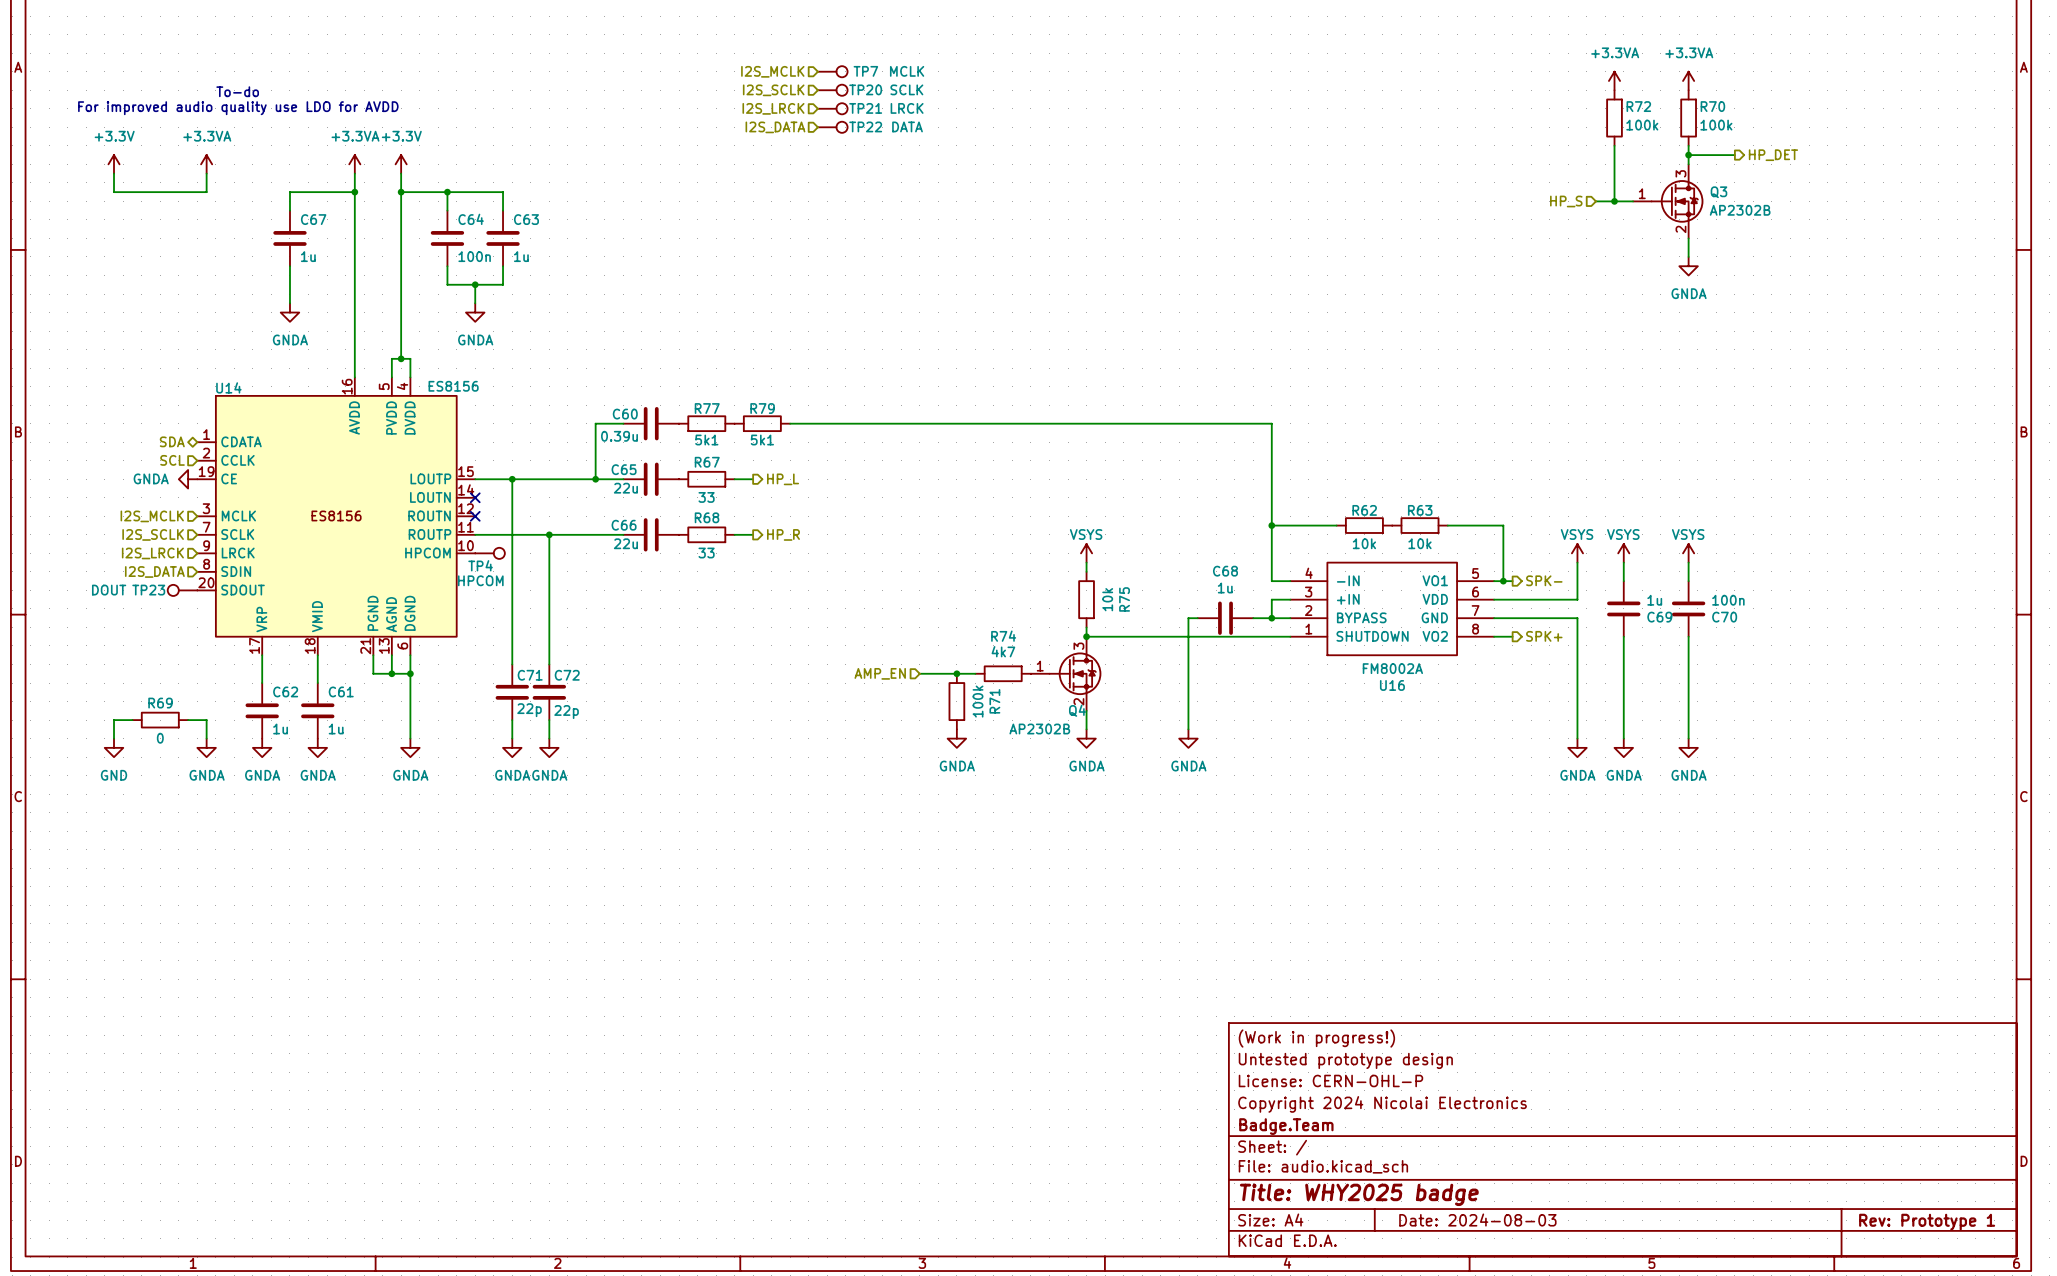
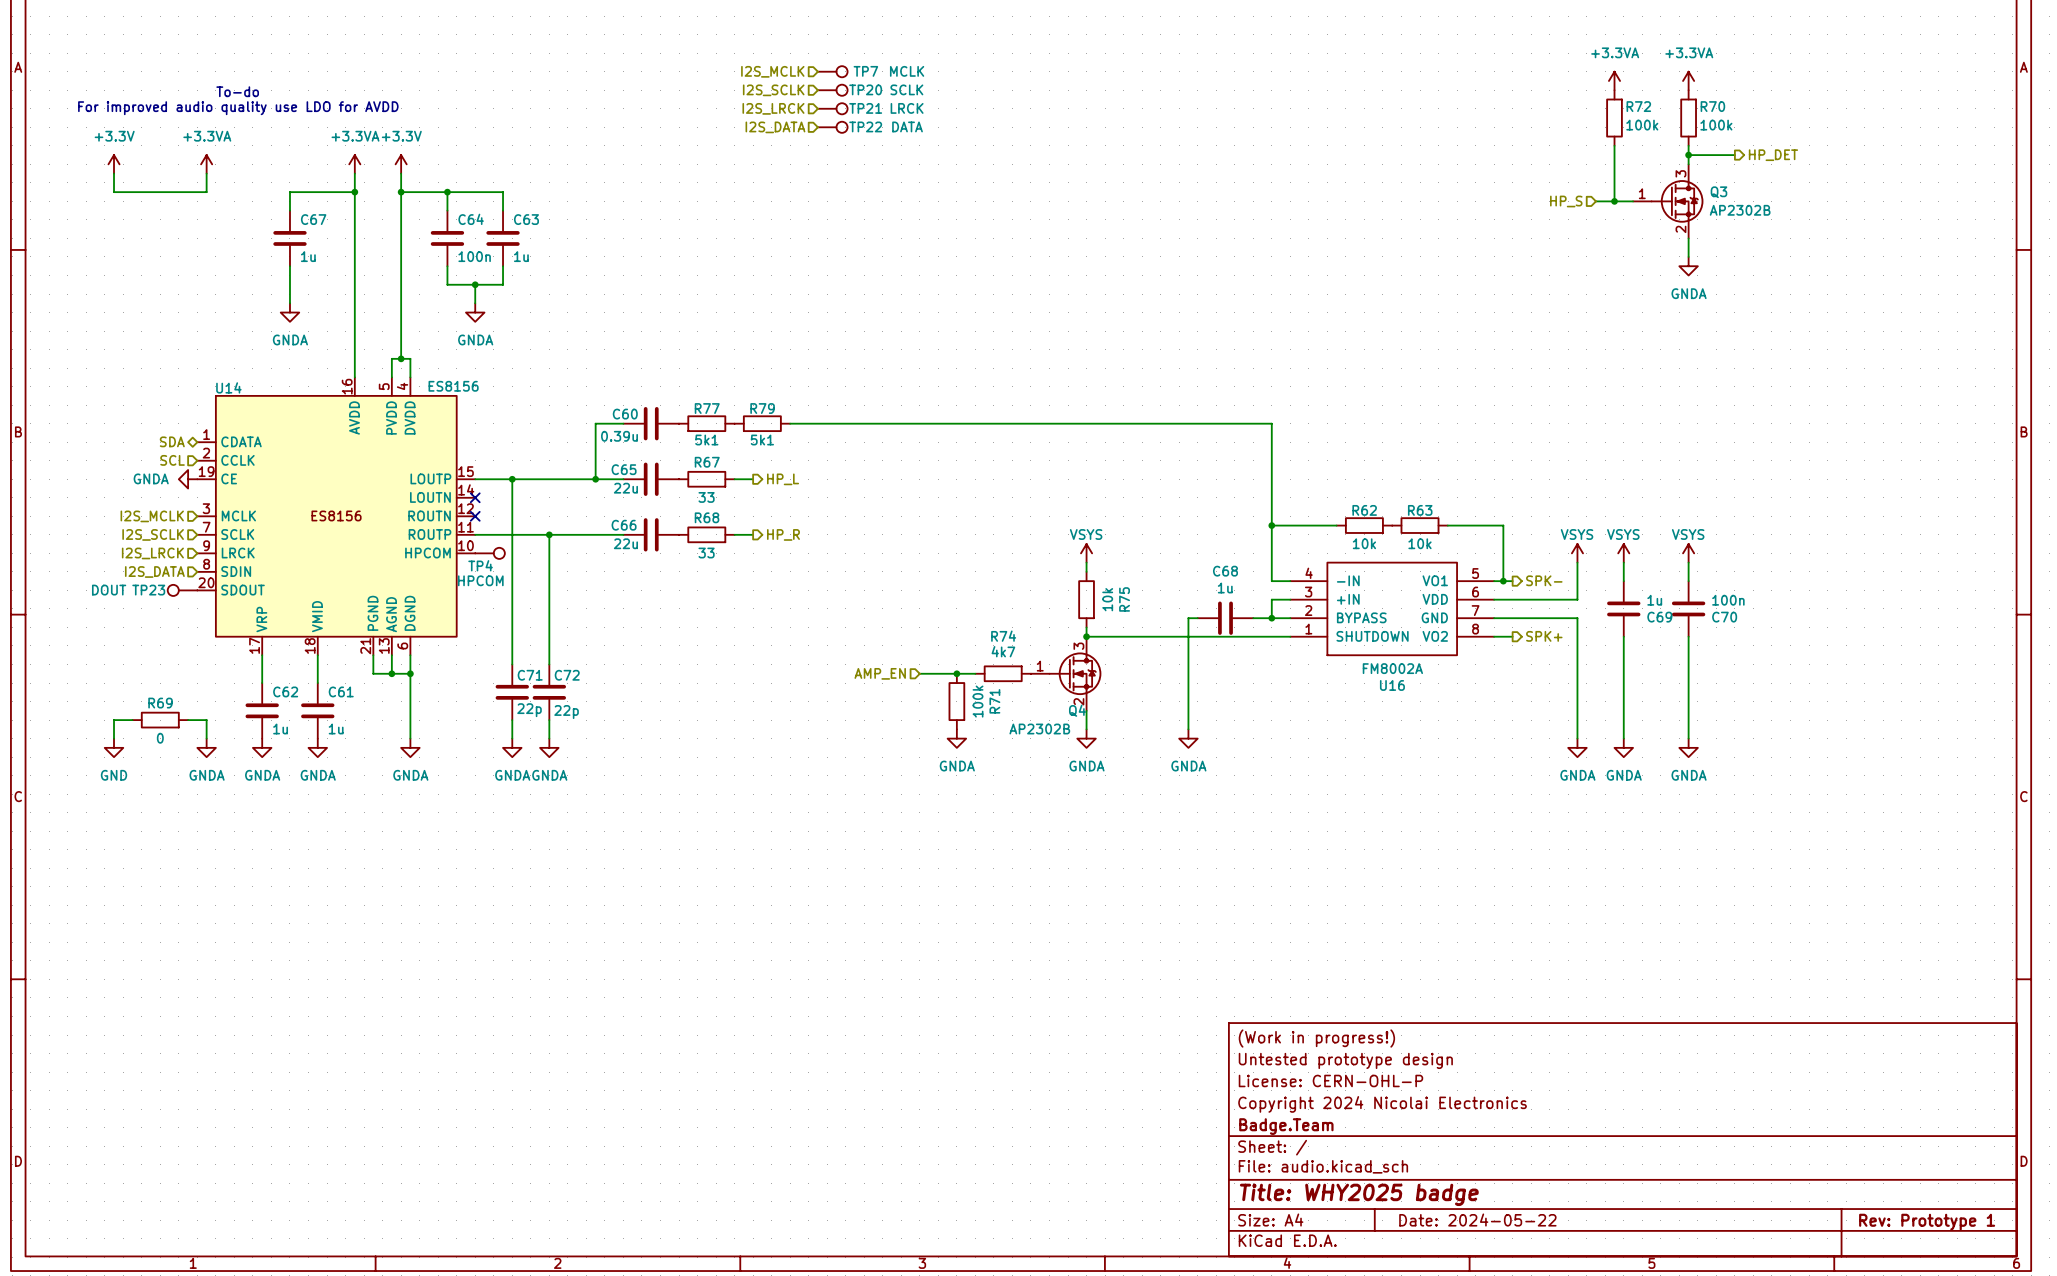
title block: Date: 2024-08-03 (1477, 1220) -> Date: 2024-05-22 (1477, 1220)

